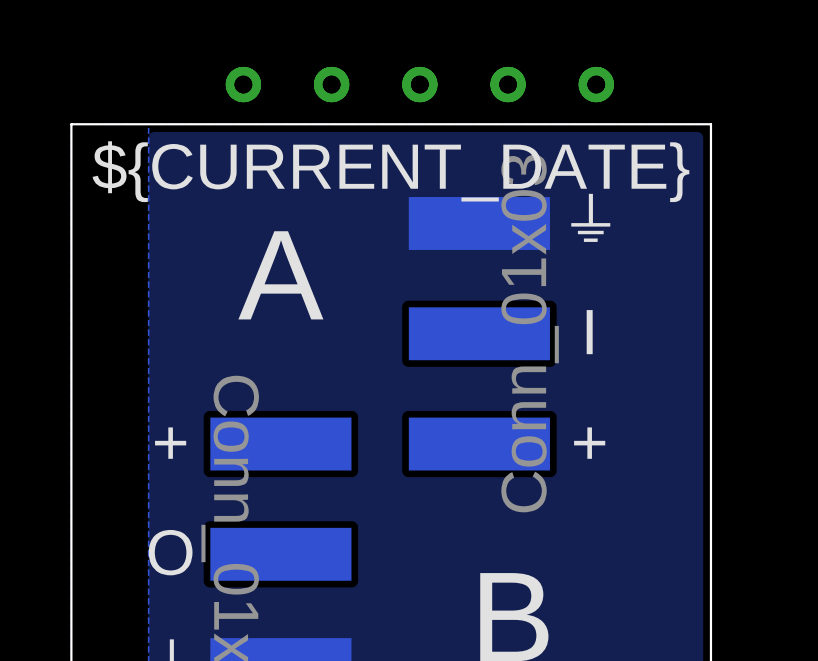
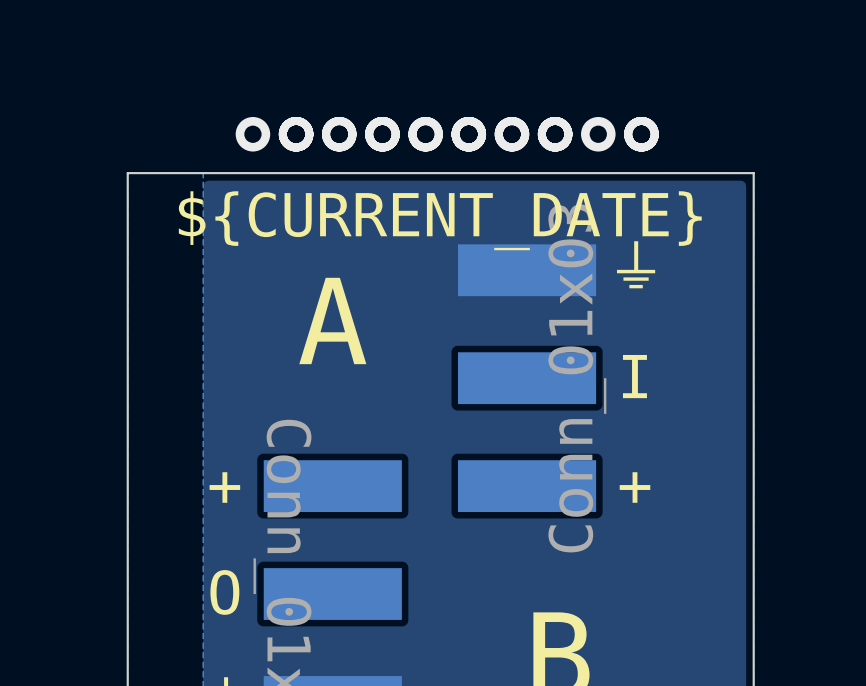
via: none -> (252, 134)
via: none -> (339, 134)
via: none -> (425, 134)
via: none -> (511, 134)
via: none -> (598, 134)

